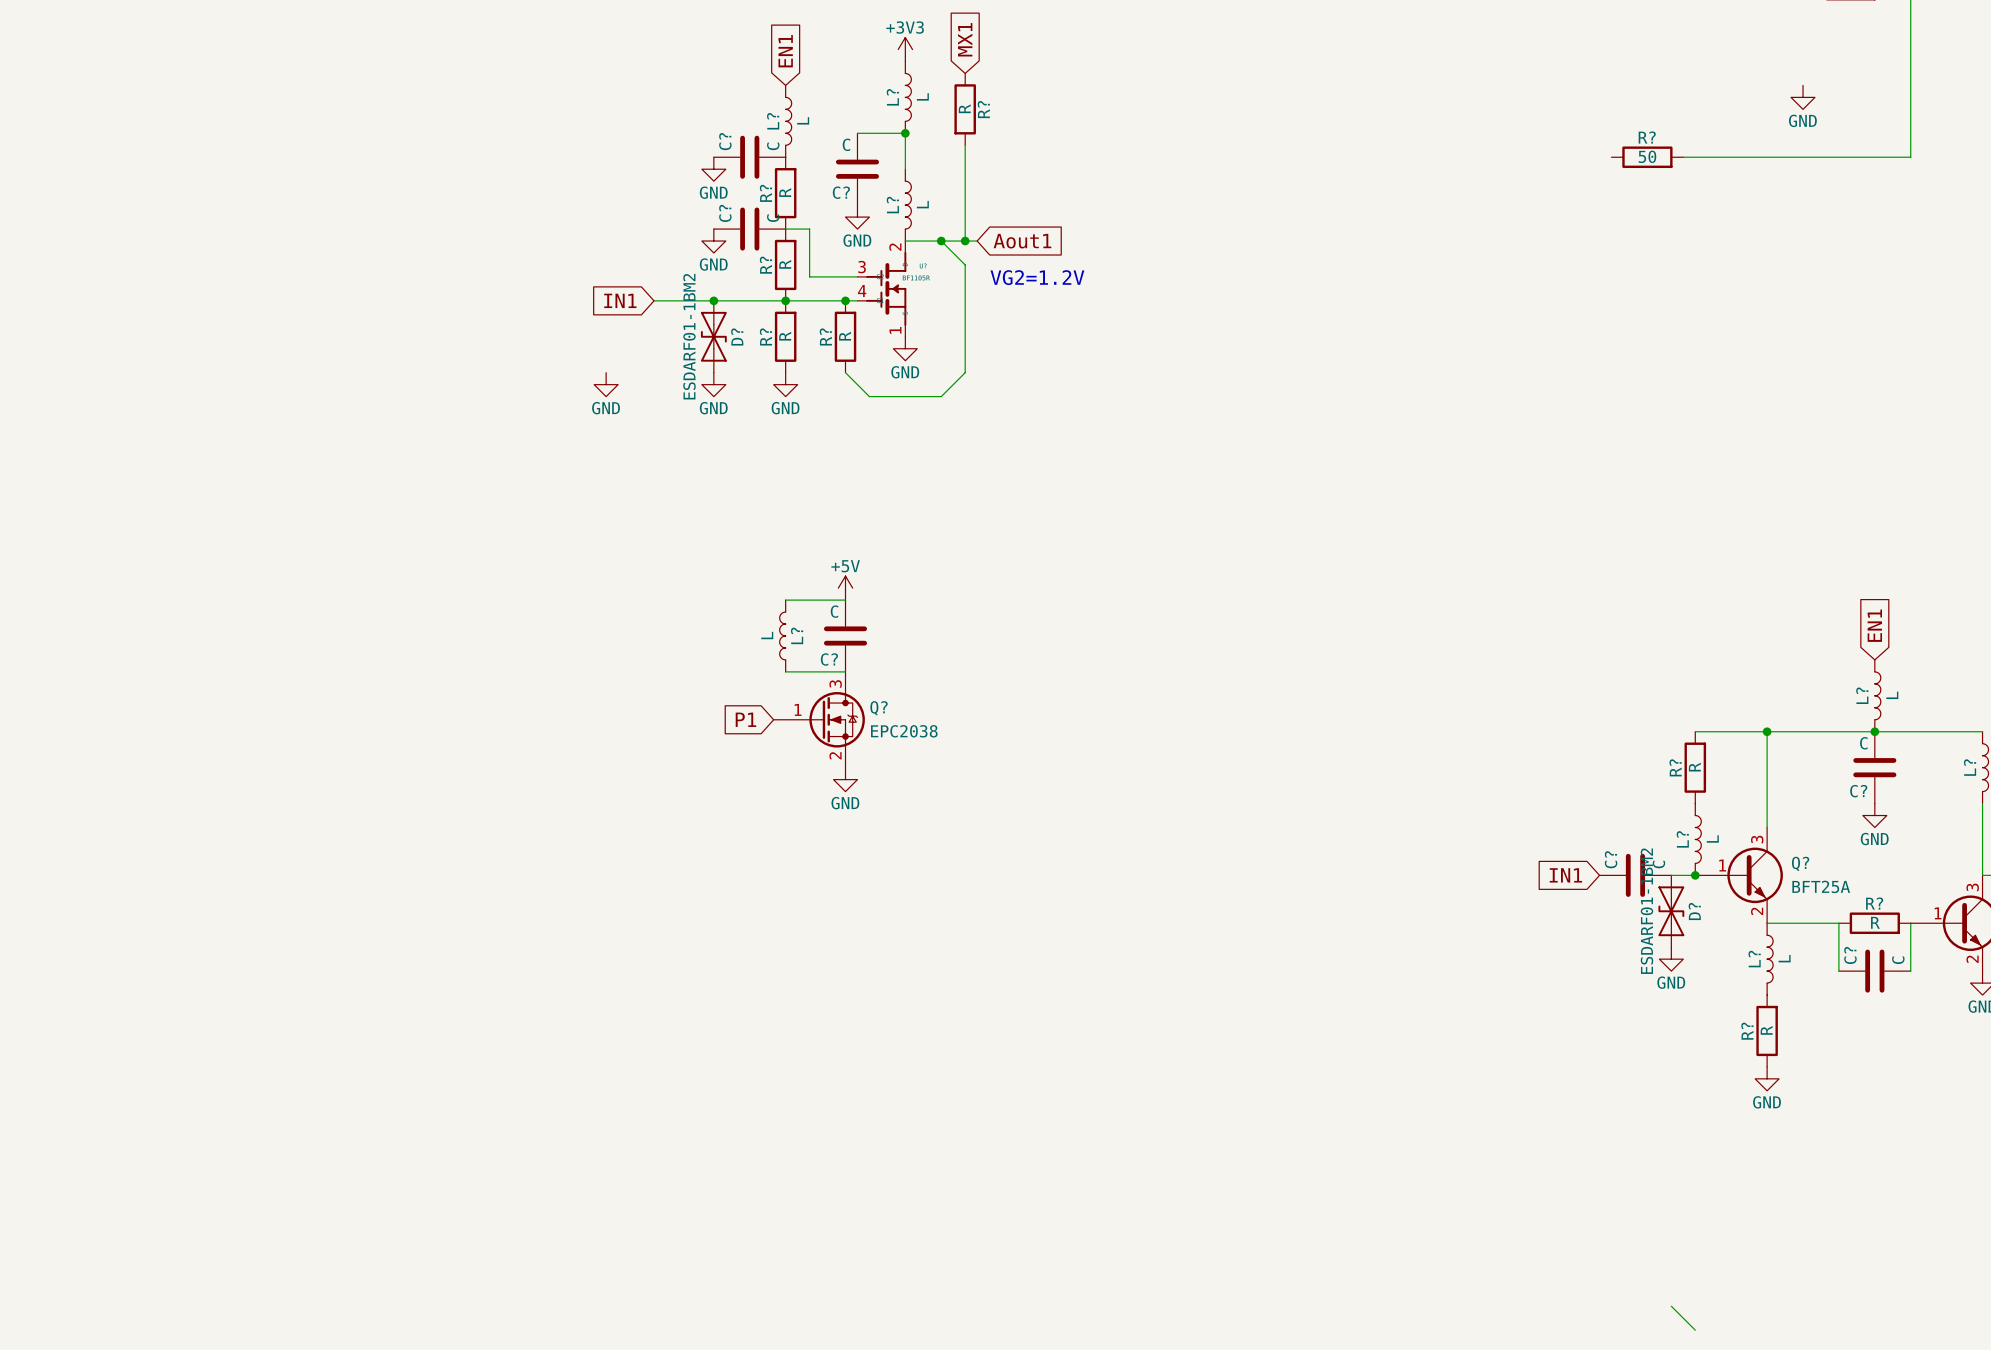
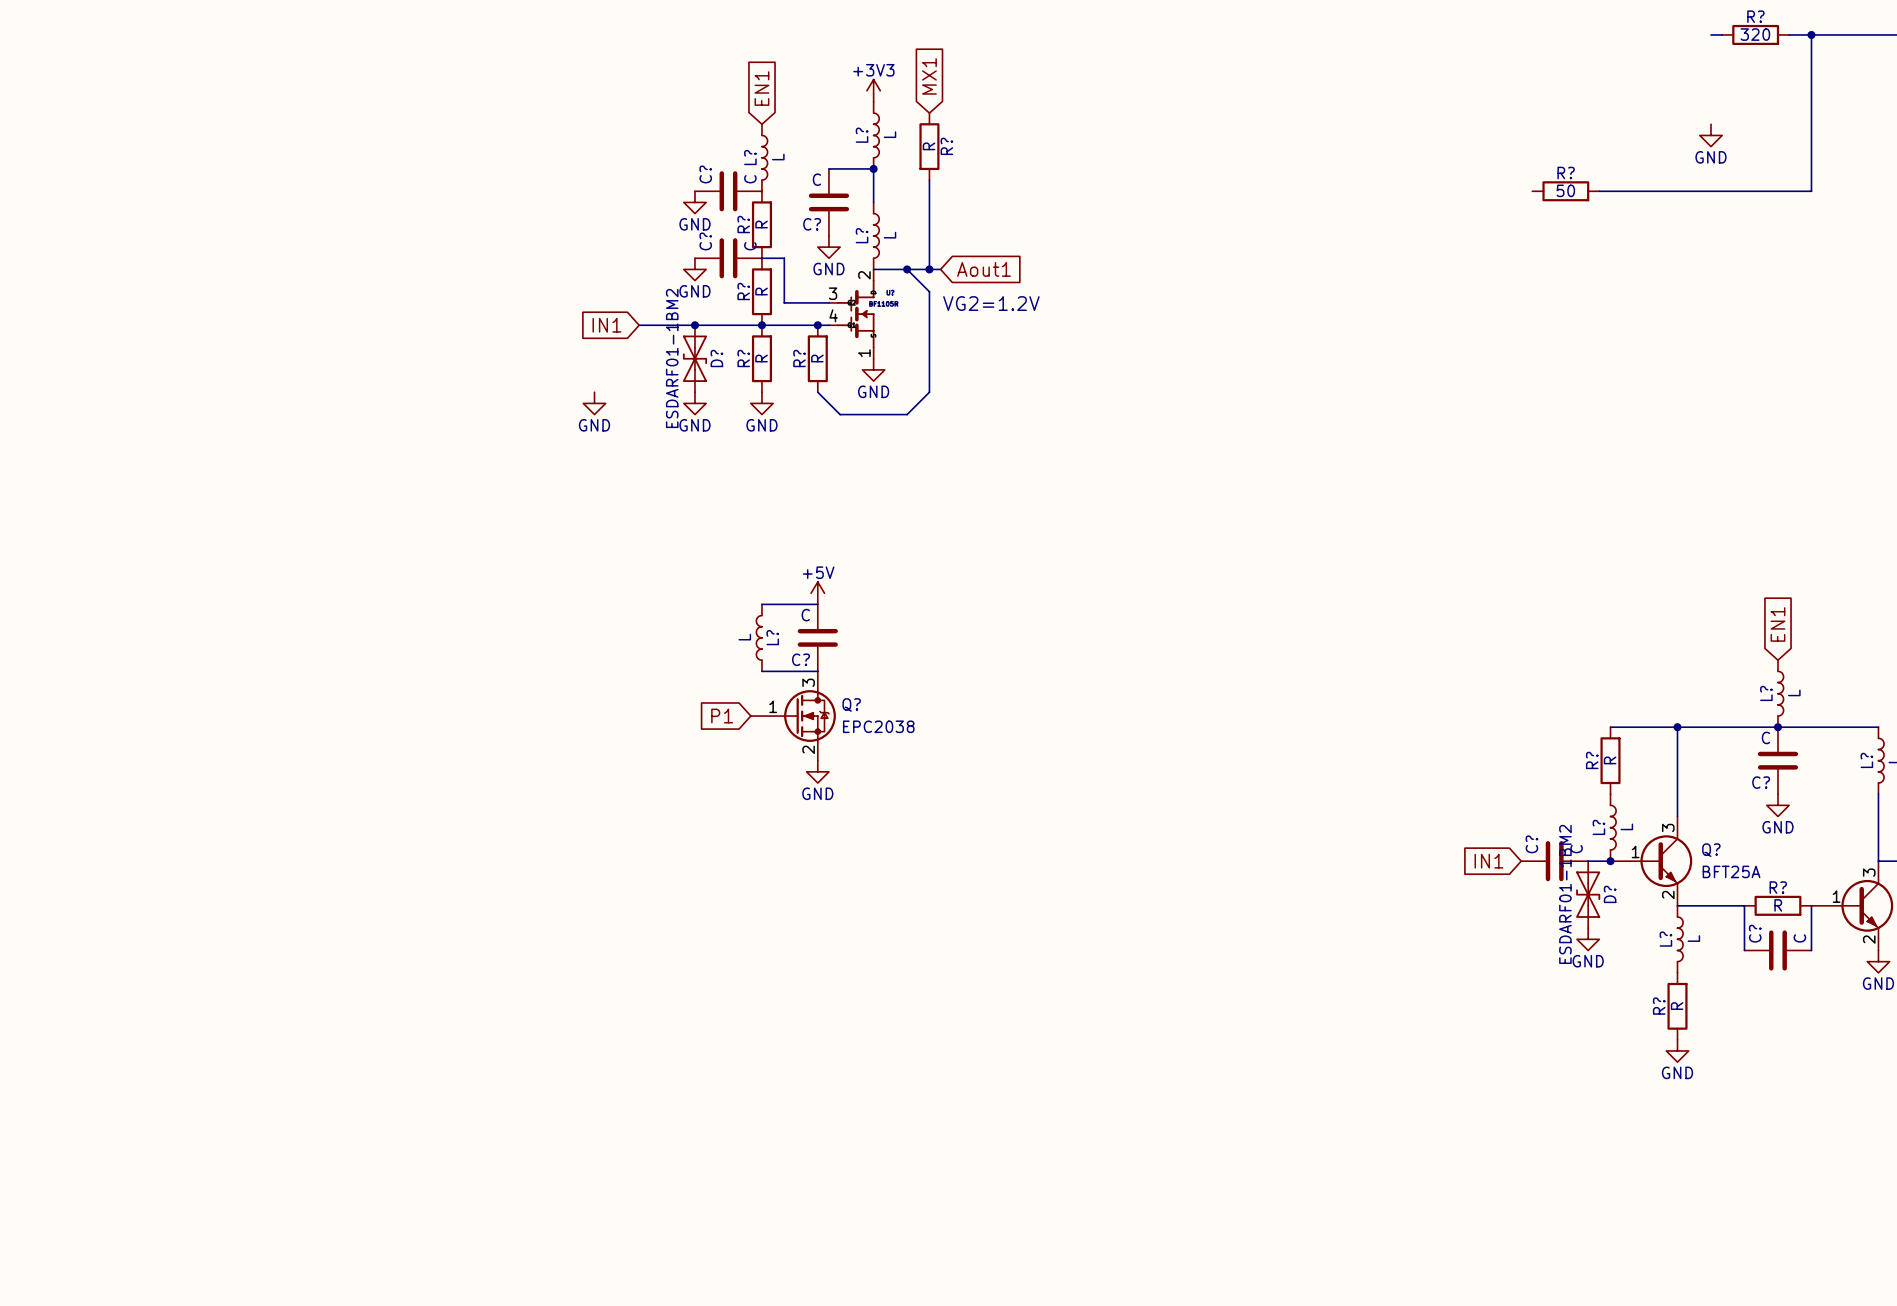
wire: (1671, 1306) (1695, 1330) -> none

